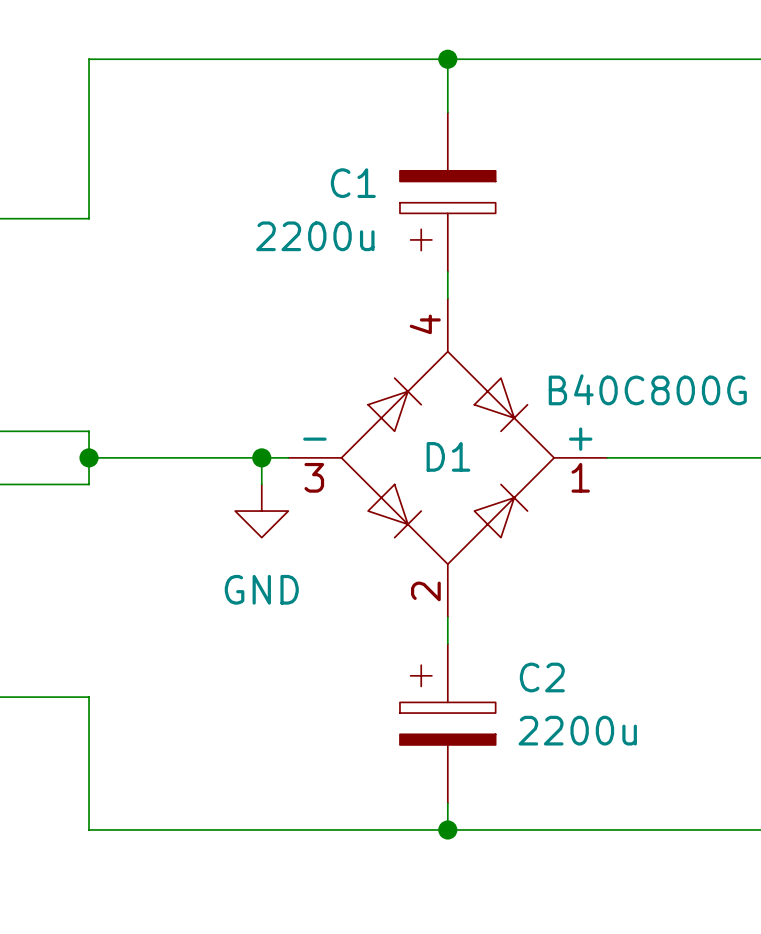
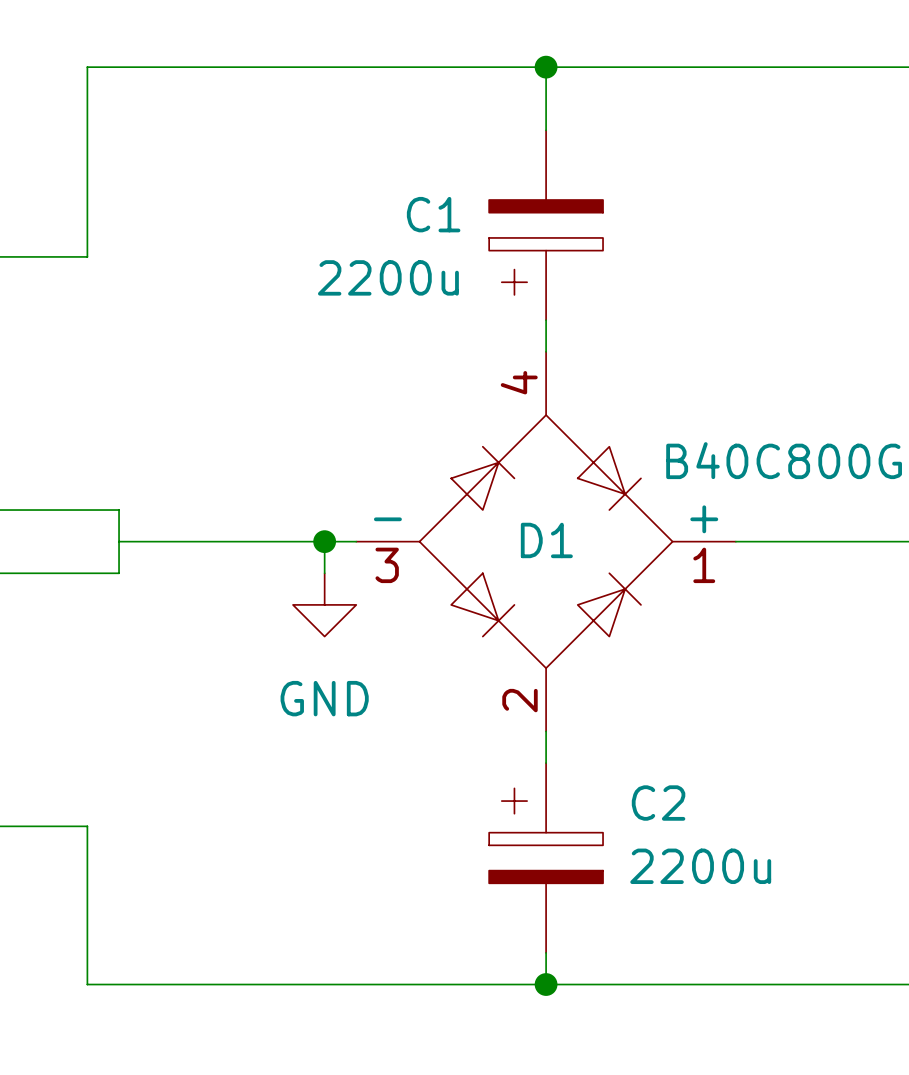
wire: (89, 59) (89, 218) (62, 218) -> (119, 67) (87, 67) (87, 256)
junction: (89, 457) -> none
wire: (62, 697) (89, 697) (89, 829) -> (87, 826) (87, 984) (119, 984)

